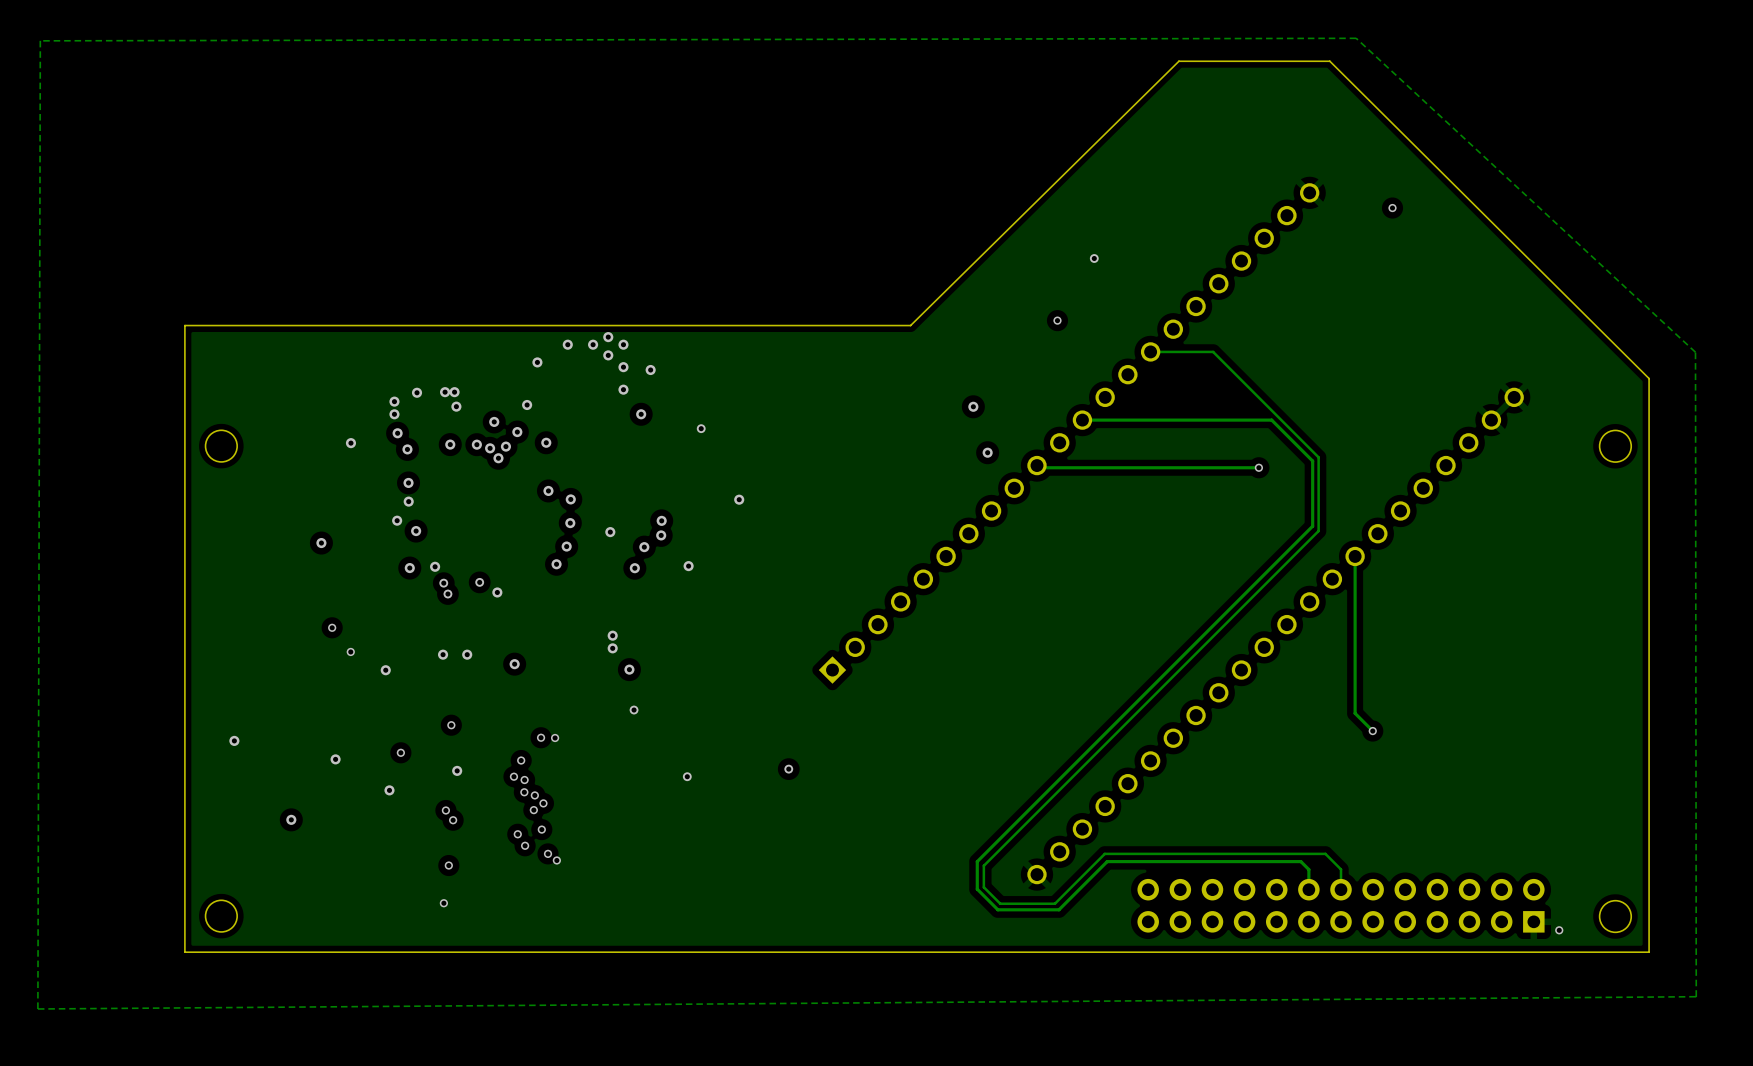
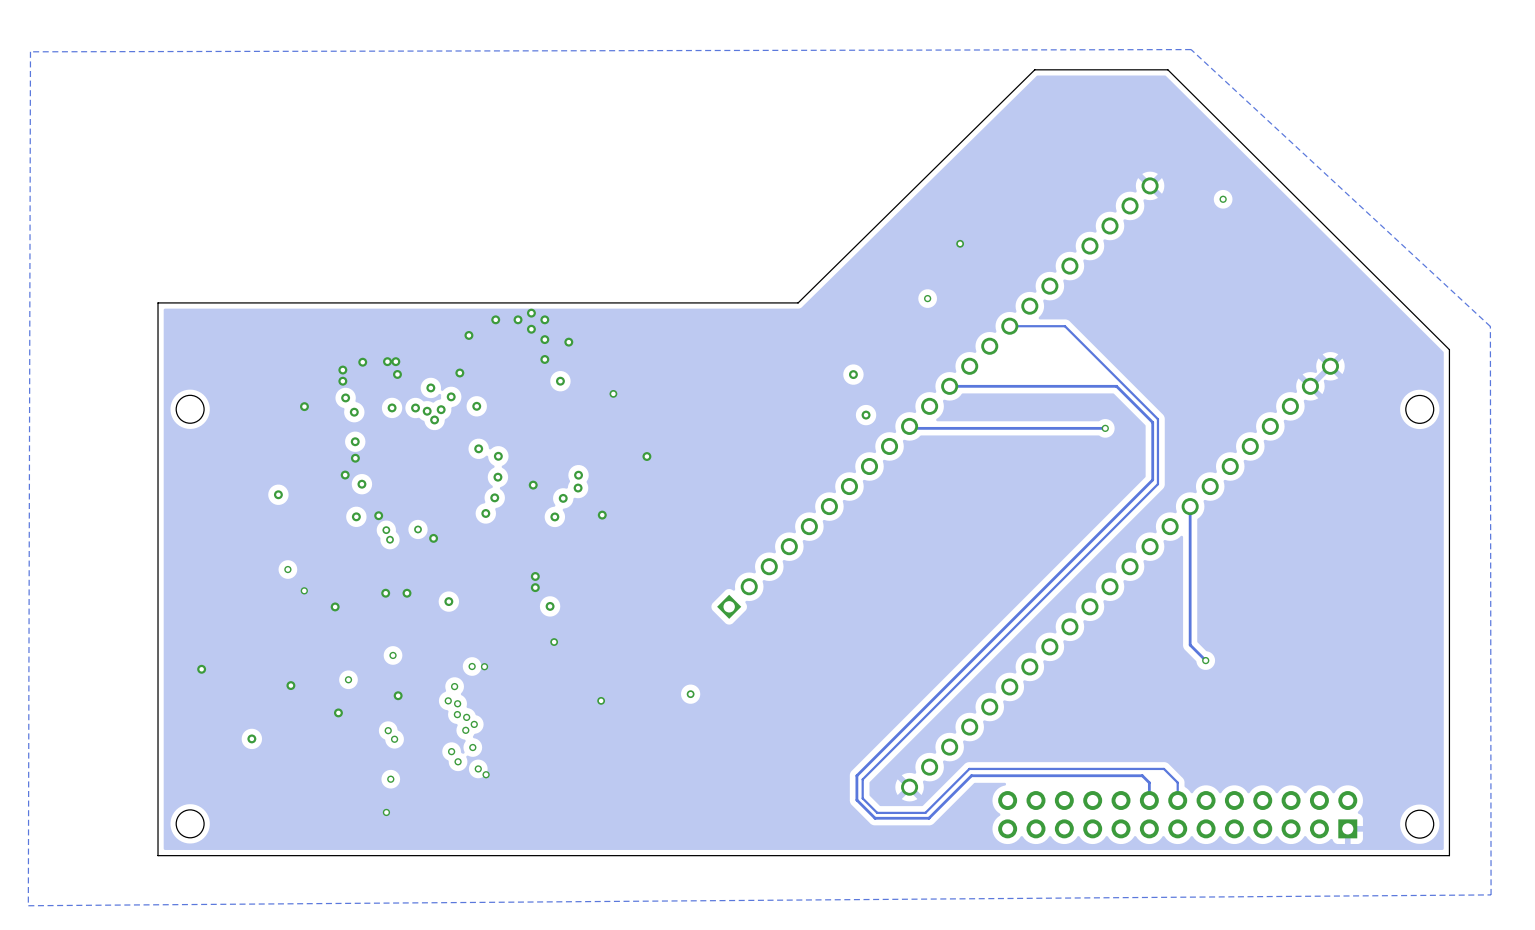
via: (1559, 930) -> none

